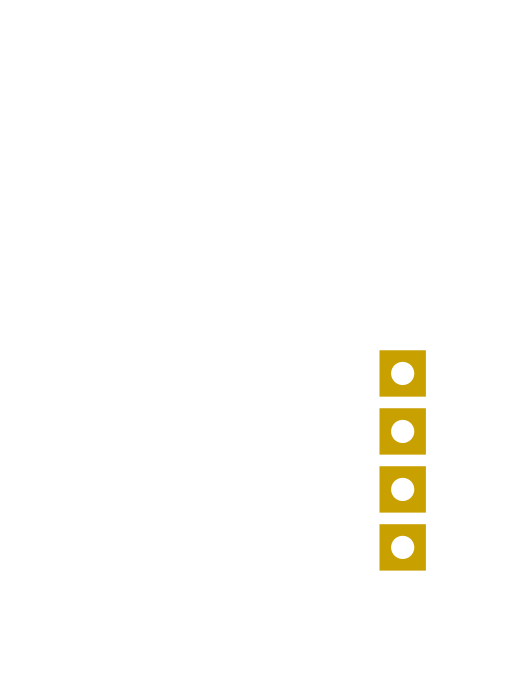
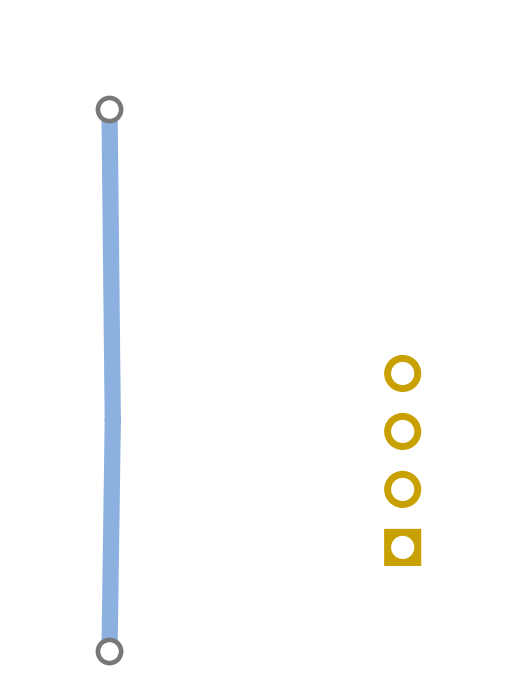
track: none -> (109, 109) (112, 419) (109, 651)
via: none -> (109, 109)
part footprint: [379, 350, 426, 571] -> [384, 354, 422, 566]
via: none -> (109, 651)

